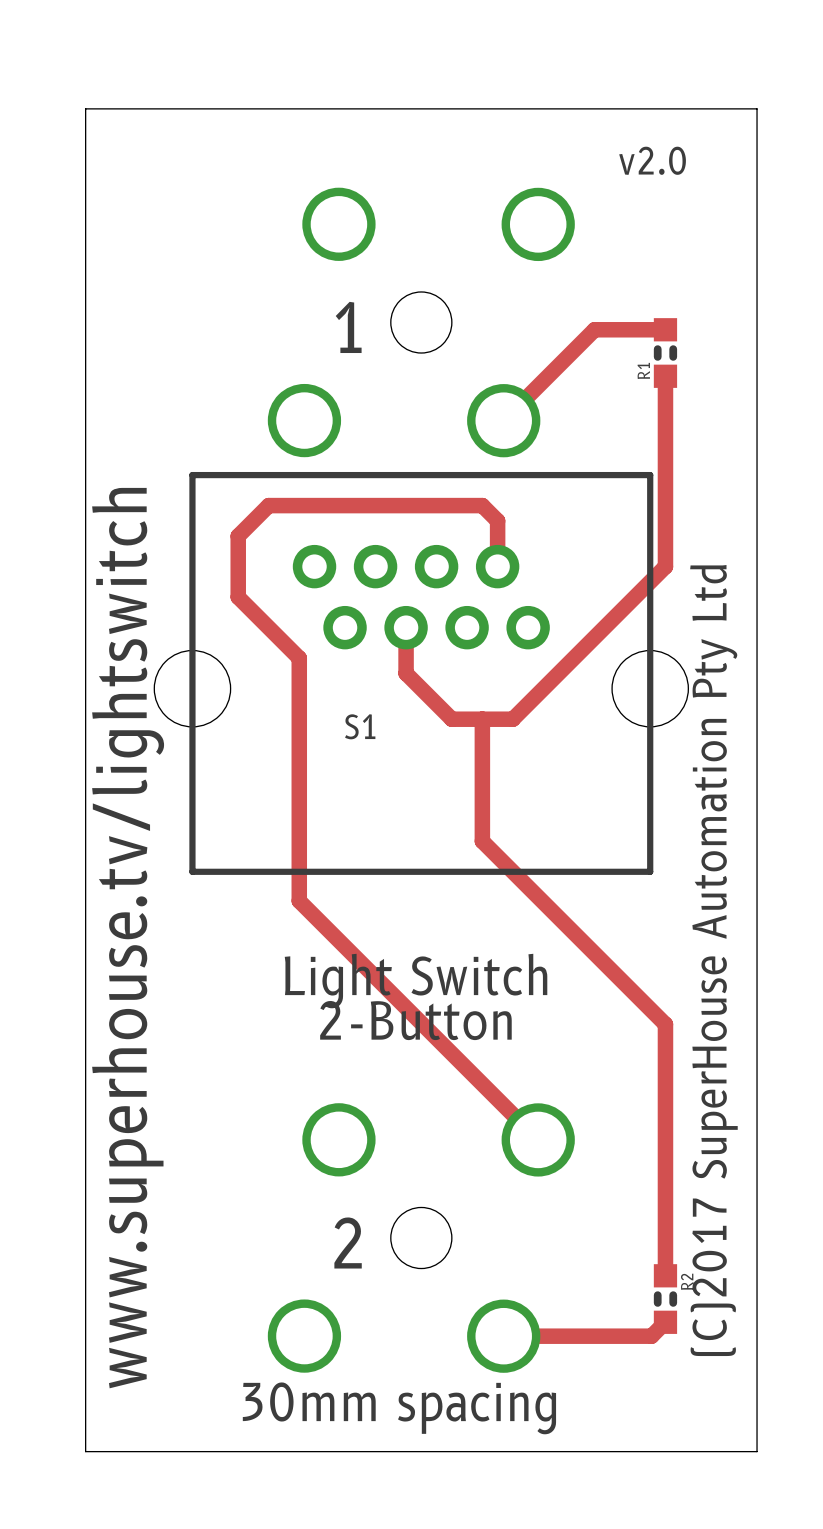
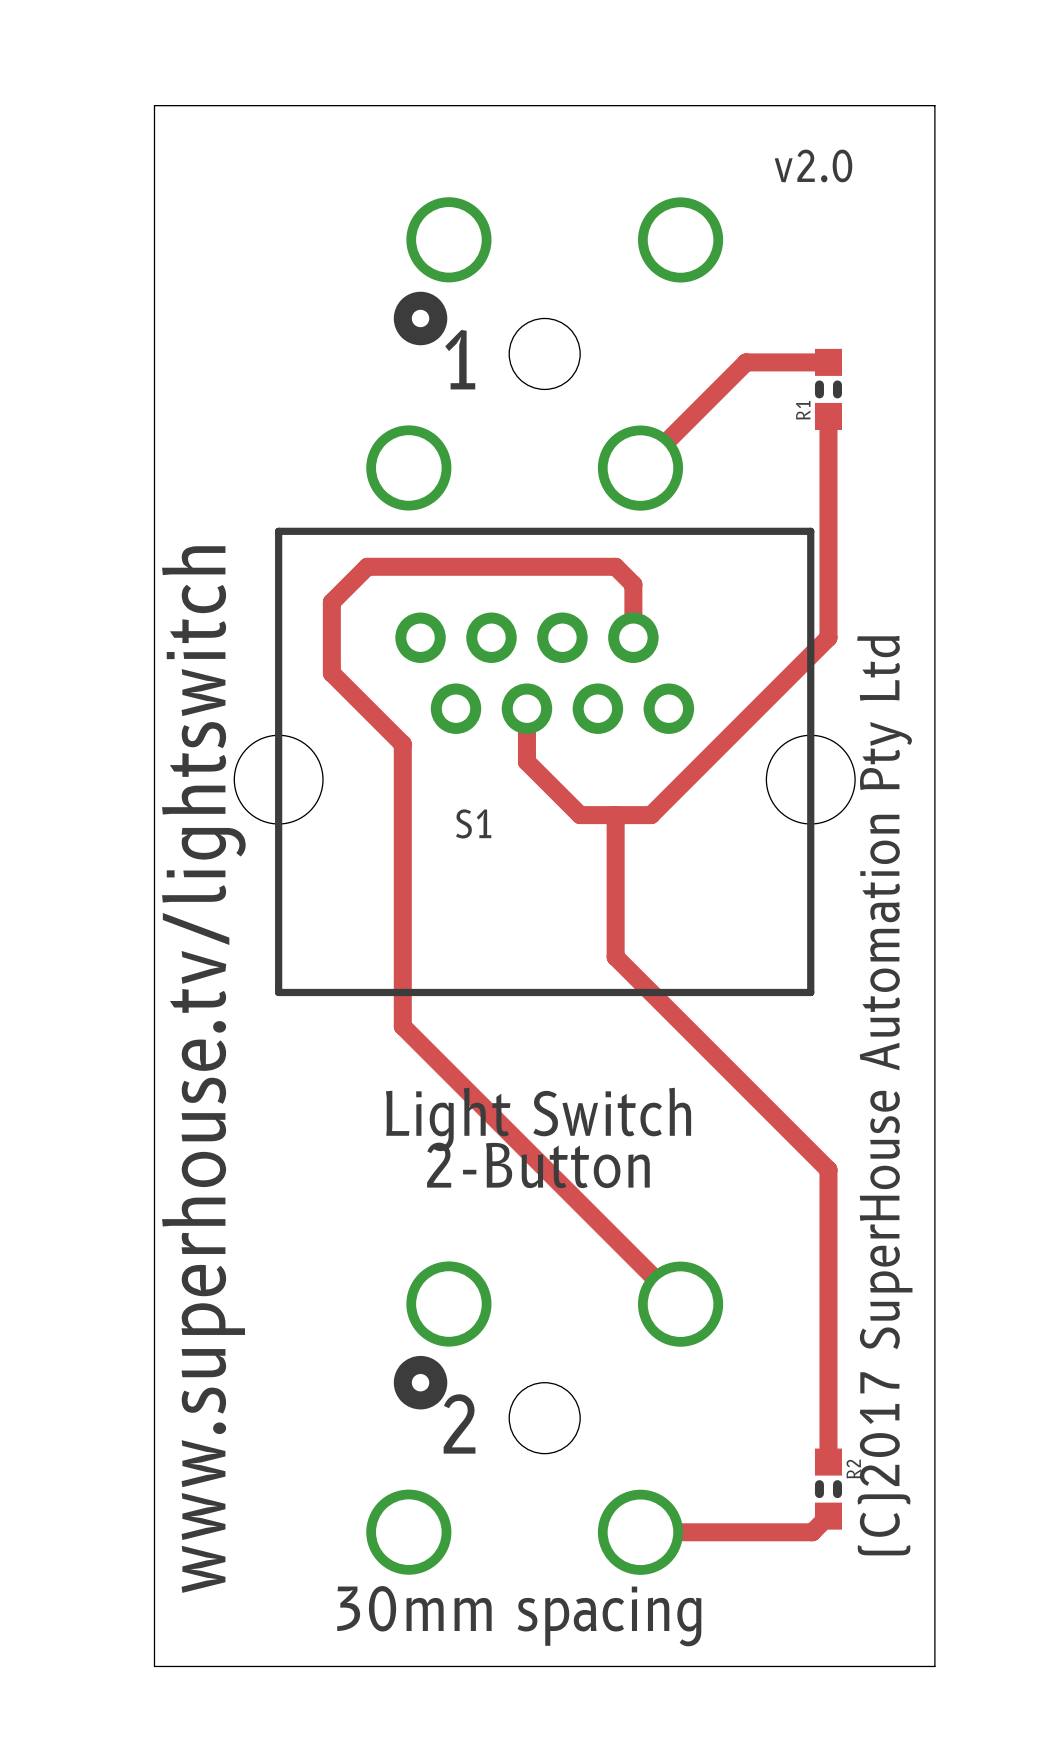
drawing: none -> [393, 291, 448, 346]
drawing: none -> [393, 1355, 448, 1410]

